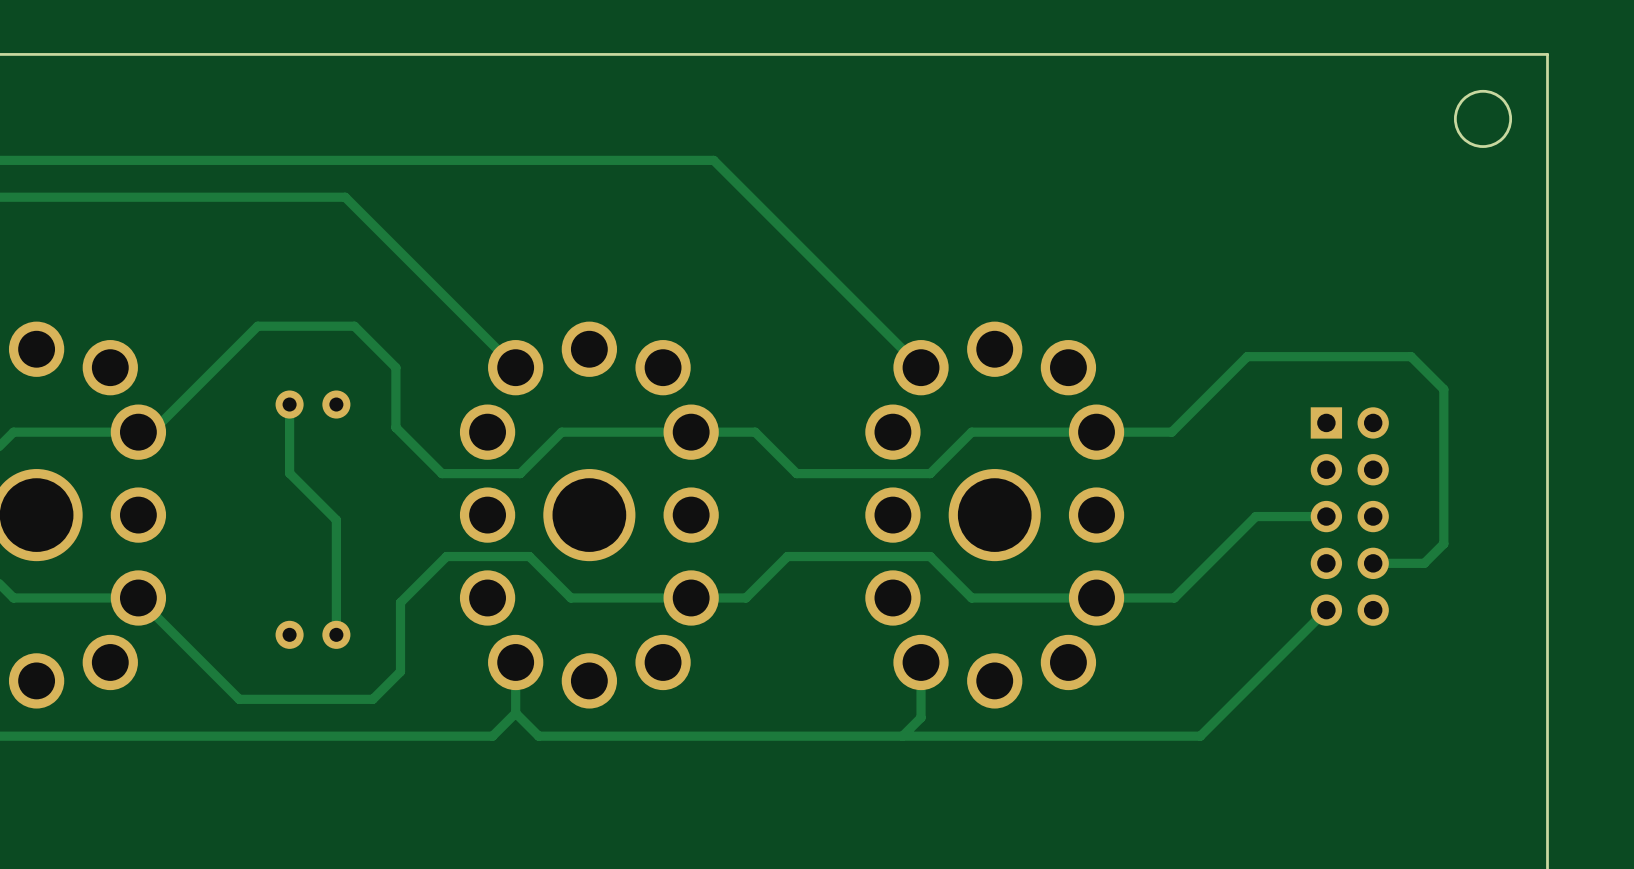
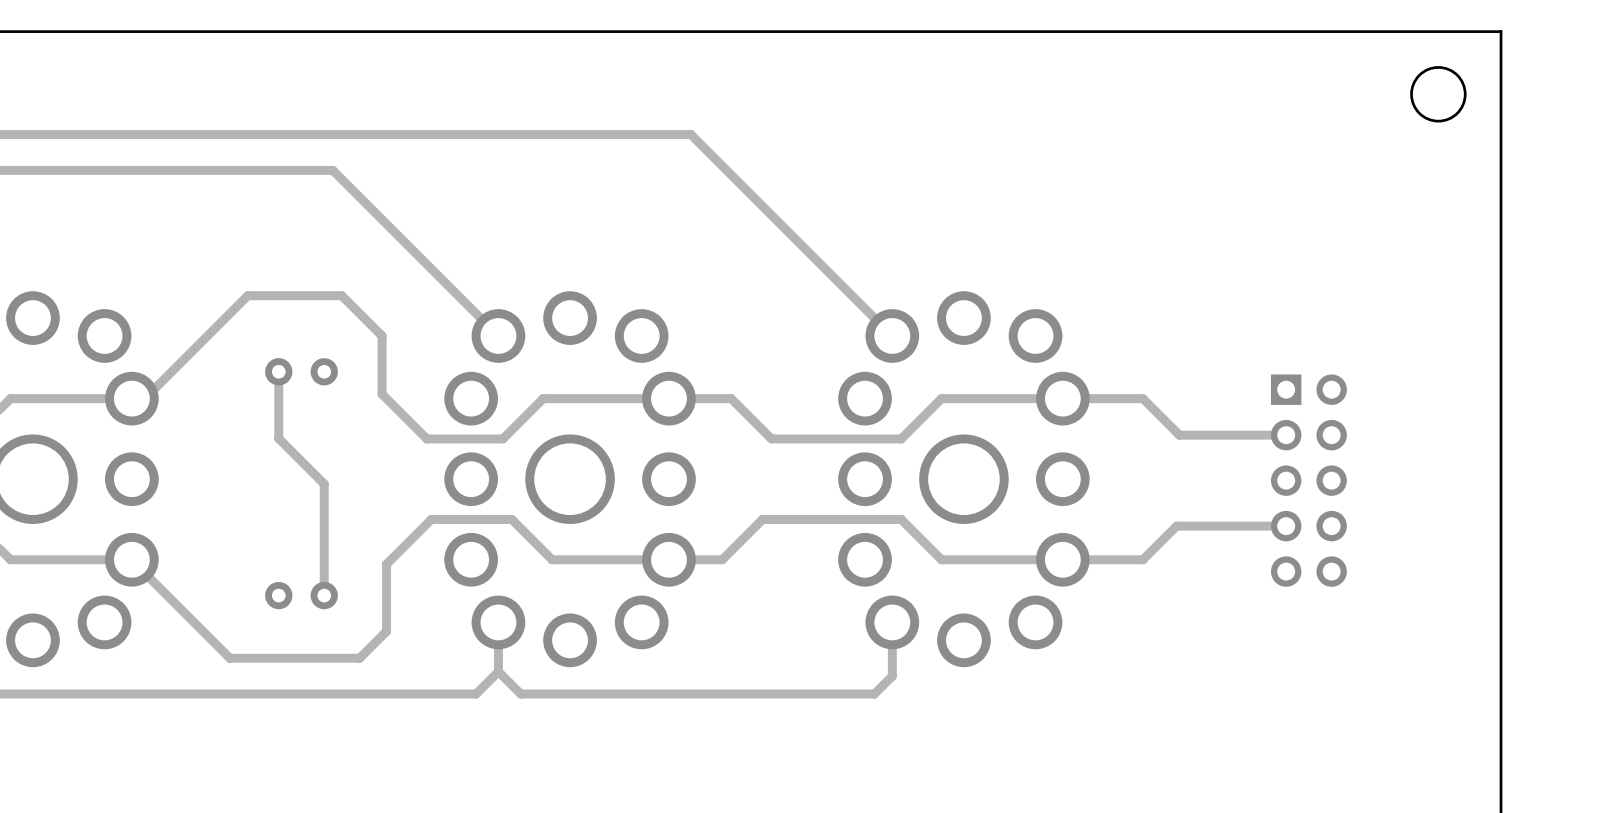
track: (1171, 432) (1247, 356) (1411, 356) (1443, 389) (1443, 543) (1424, 563) (1373, 563) -> (1135, 398) (1142, 398) (1179, 435) (1286, 435)
track: (1326, 516) (1255, 516) (1174, 597) -> (1286, 526) (1176, 526) (1142, 559) (1138, 559)
track: (1326, 610) (1200, 736) (902, 736) -> none

